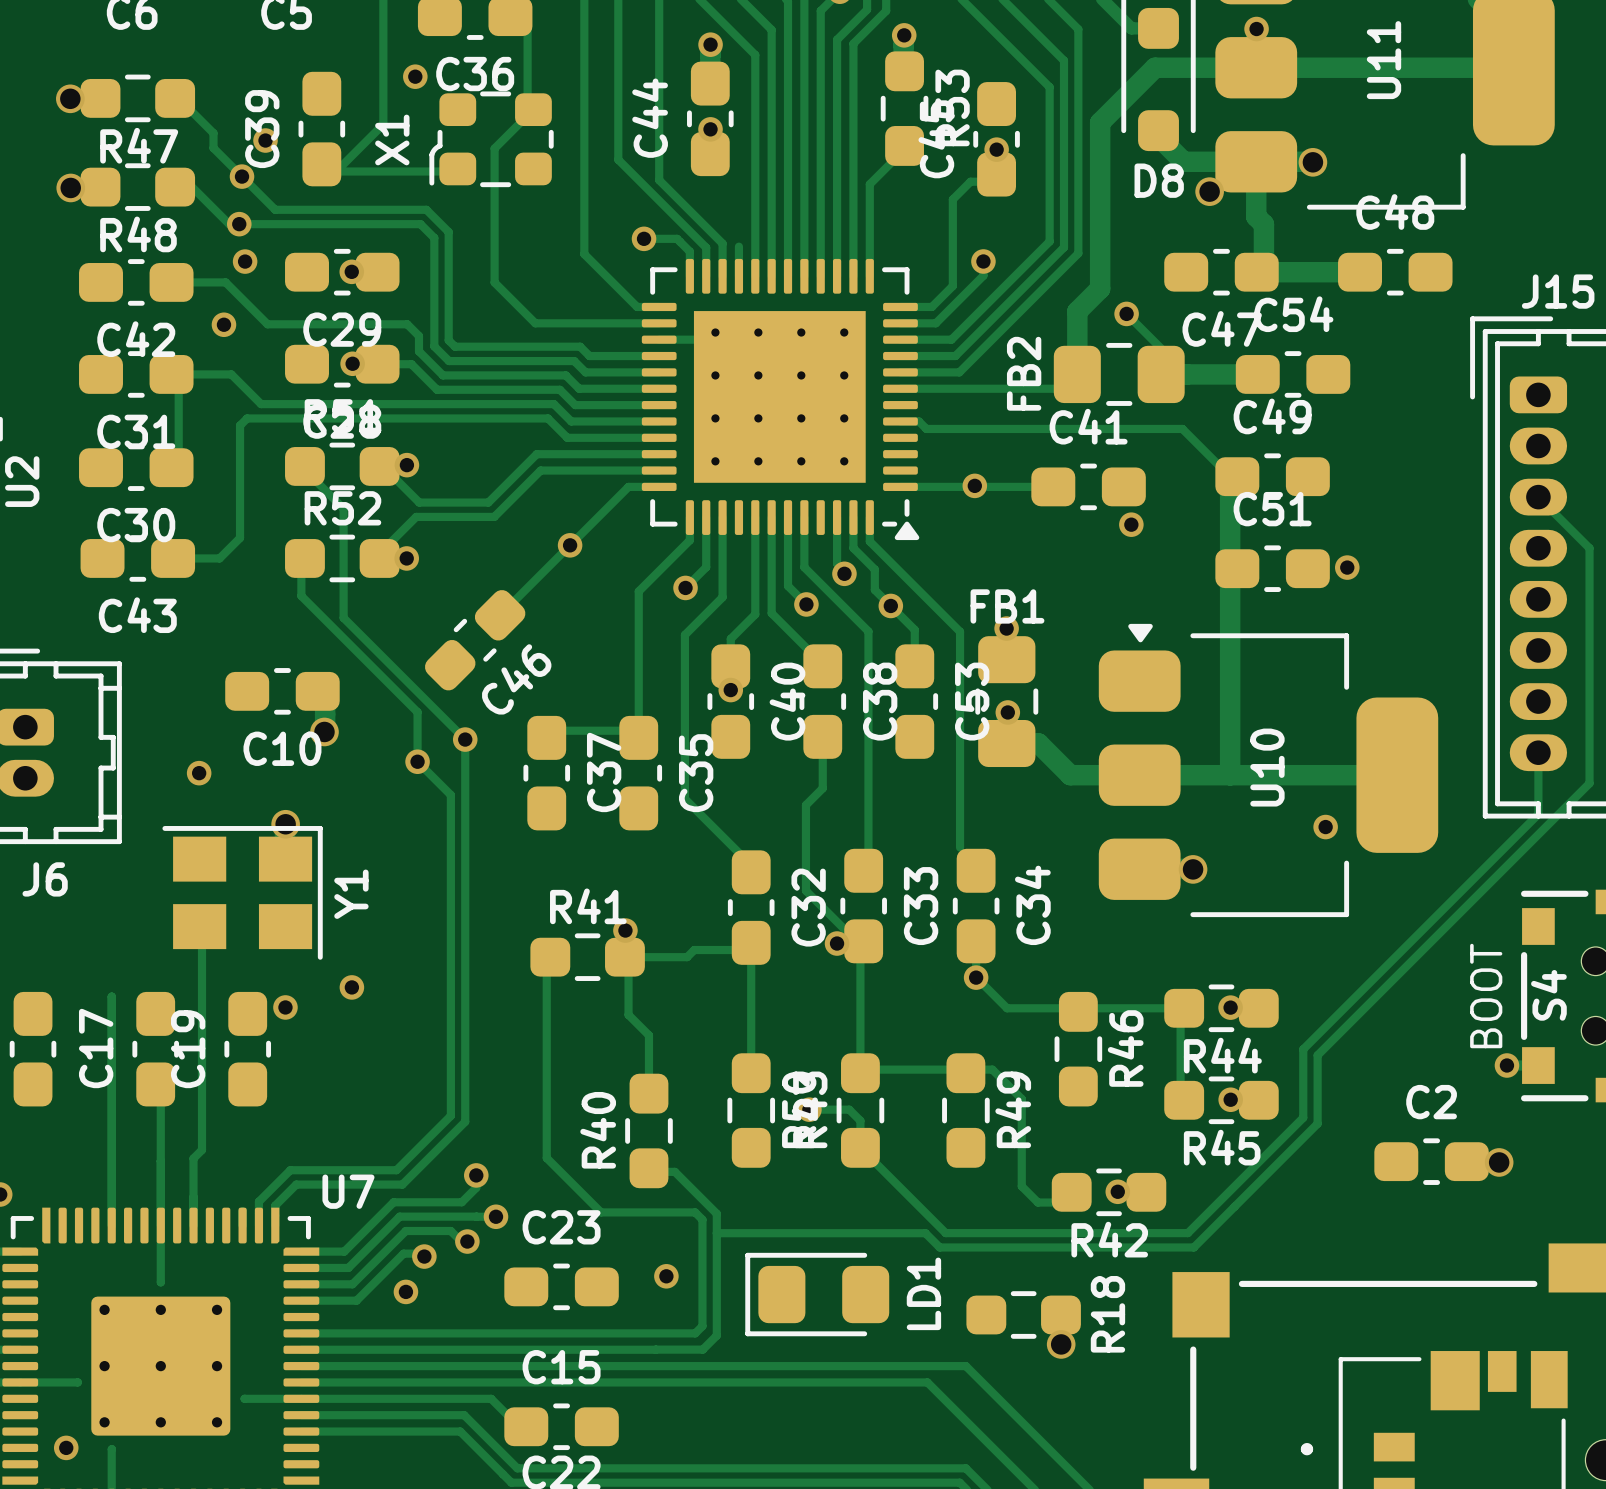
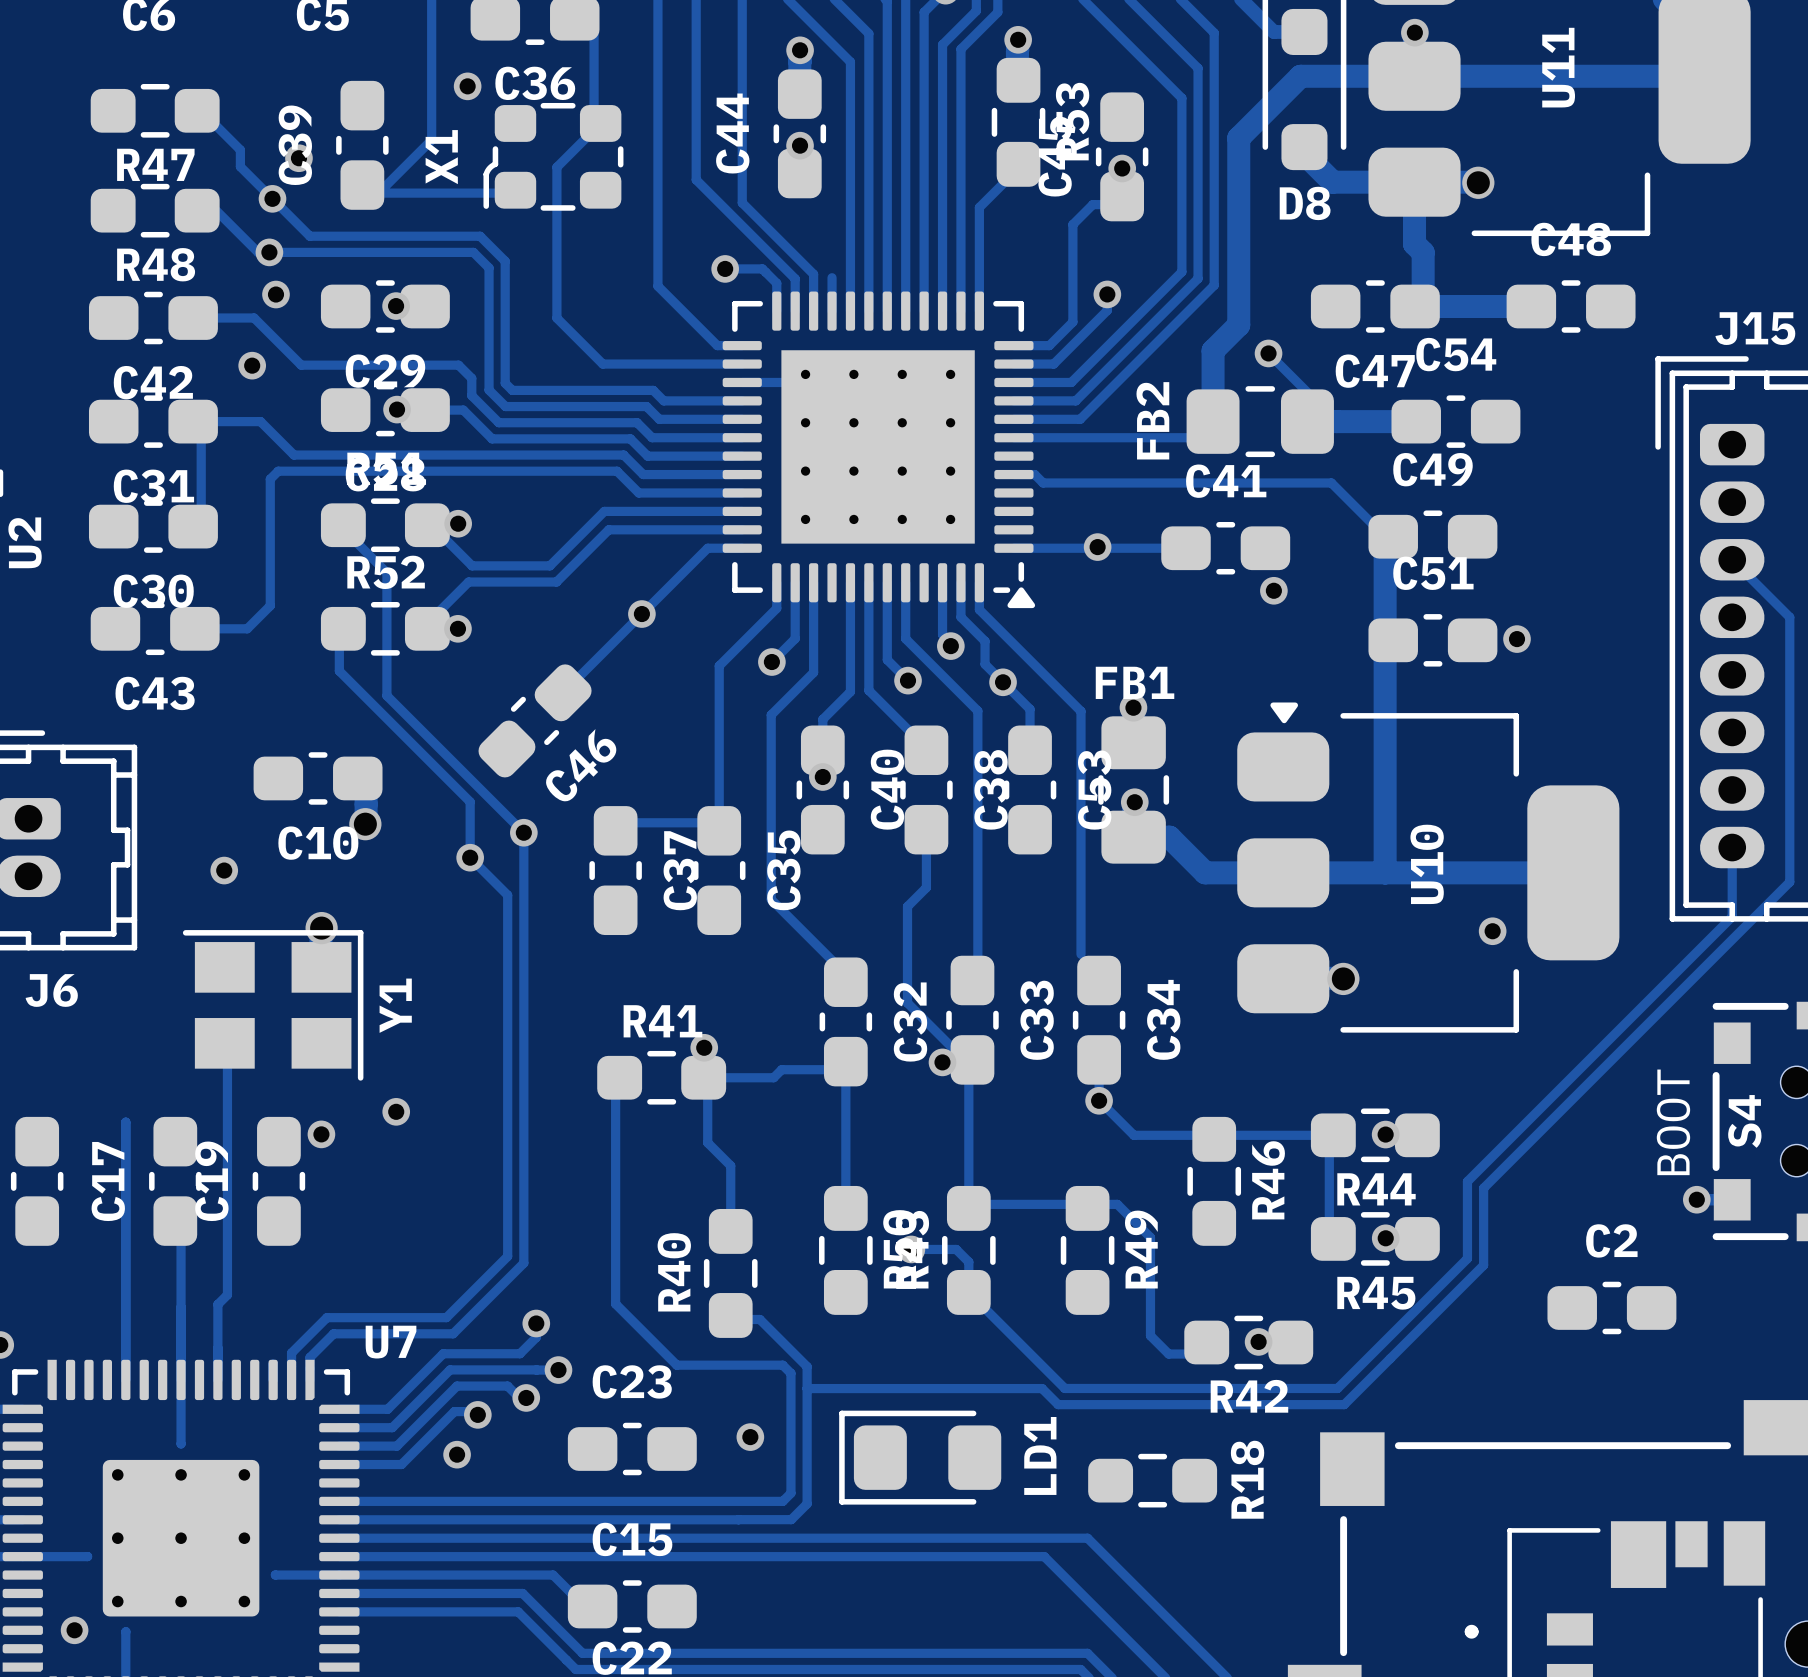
via: (70, 98) -> none
via: (70, 187) -> none
via: (1209, 191) -> none
via: (1499, 1162) -> none
via: (1061, 1344) -> none

